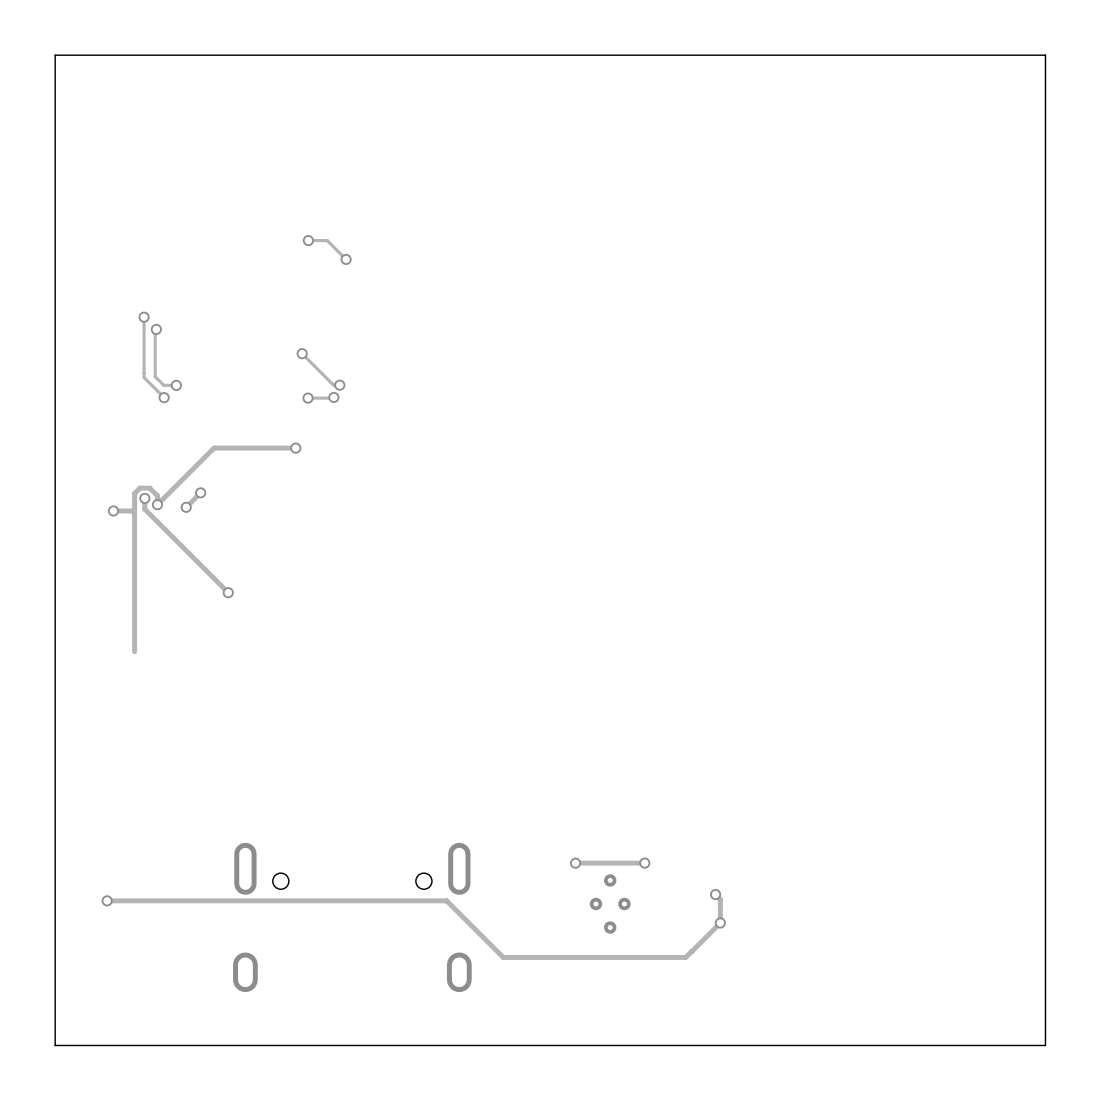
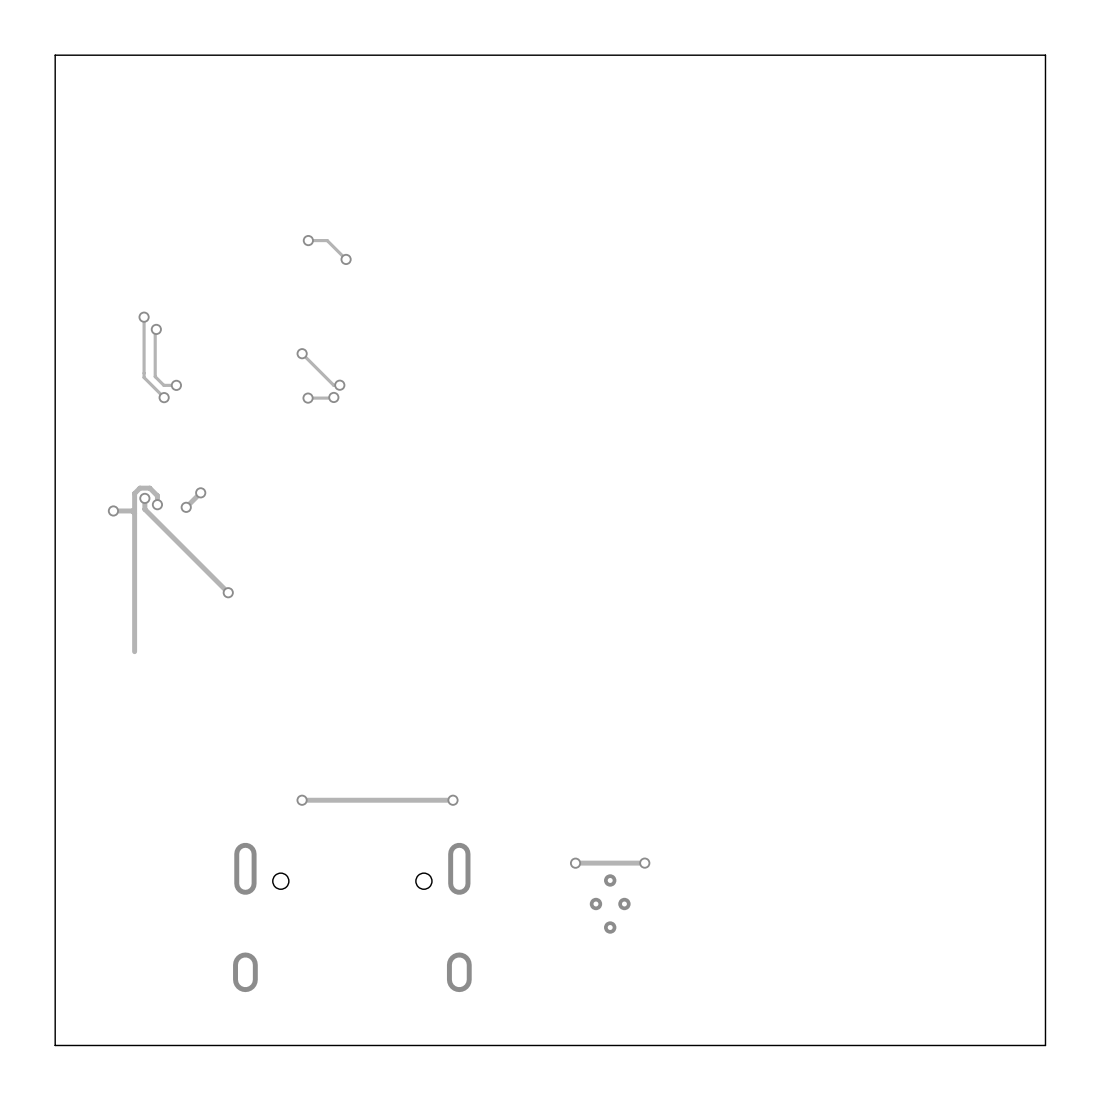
track: (295, 448) (214, 448) (157, 504) -> none
via: (295, 448) -> none
via: none -> (302, 800)
track: none -> (452, 800) (302, 800)
via: none -> (452, 800)
track: (715, 894) (720, 899) (720, 923) (691, 951) -> none
via: (715, 894) -> none
track: (107, 900) (446, 900) (503, 957) (685, 957) (691, 951) -> none
via: (107, 900) -> none
via: (720, 923) -> none

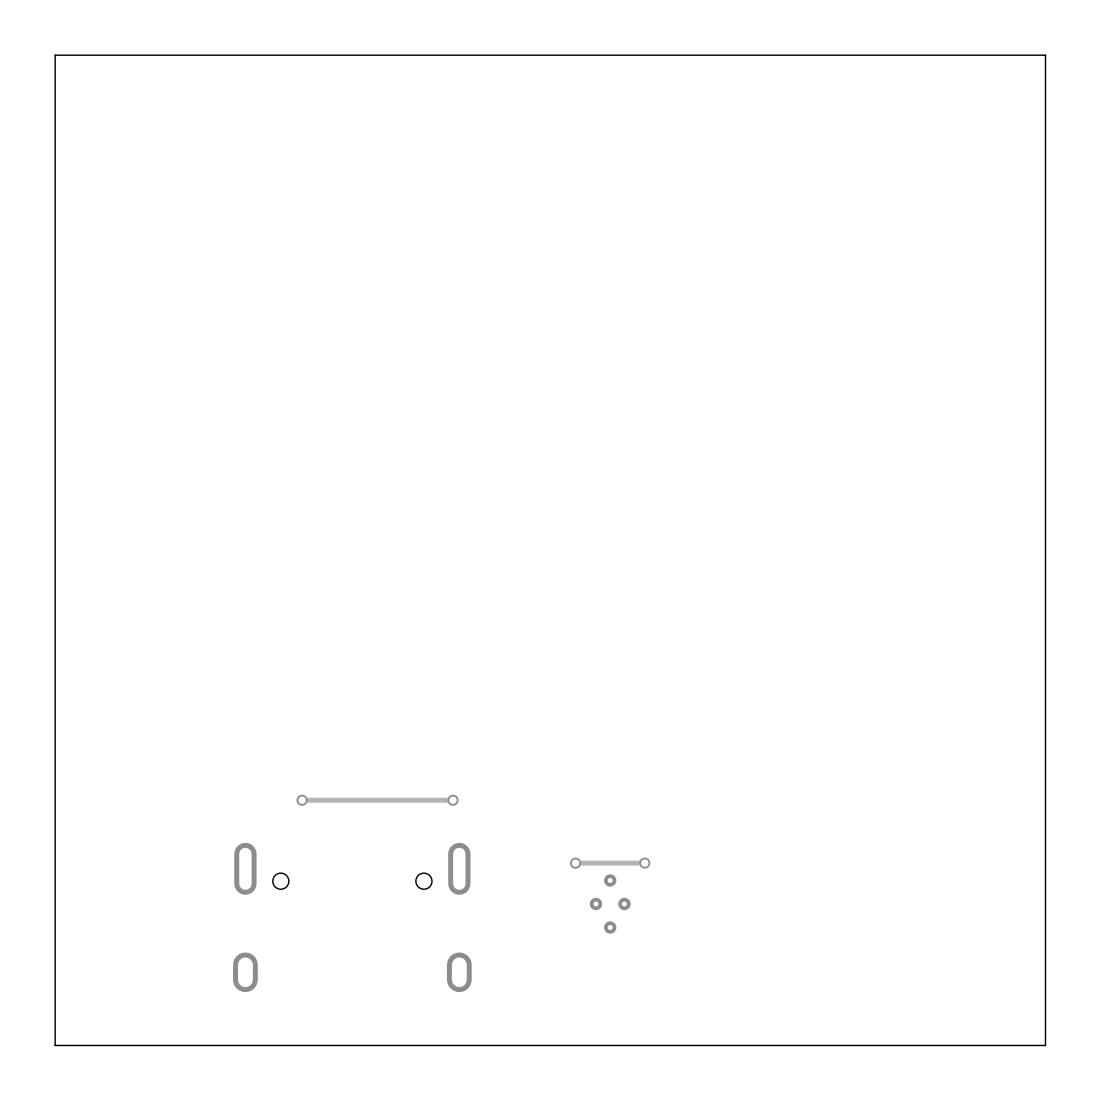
track: (308, 240) (327, 240) (346, 259) -> none
via: (308, 240) -> none
via: (346, 259) -> none
track: (144, 317) (144, 377) (164, 397) -> none
via: (144, 317) -> none
track: (156, 329) (155, 376) (163, 385) (176, 385) -> none
via: (156, 329) -> none
track: (302, 353) (333, 385) (339, 385) -> none
via: (302, 353) -> none
via: (176, 385) -> none
via: (339, 385) -> none
via: (164, 397) -> none
track: (333, 397) (308, 398) -> none
via: (333, 397) -> none
via: (308, 398) -> none
track: (200, 492) (186, 507) -> none
via: (200, 492) -> none
track: (144, 498) (144, 509) (228, 592) -> none
via: (144, 498) -> none
track: (157, 504) (157, 495) (149, 488) (139, 488) (134, 493) (134, 651) -> none
via: (157, 504) -> none
via: (186, 507) -> none
track: (113, 510) (132, 510) (134, 513) -> none
via: (113, 510) -> none
via: (228, 592) -> none

